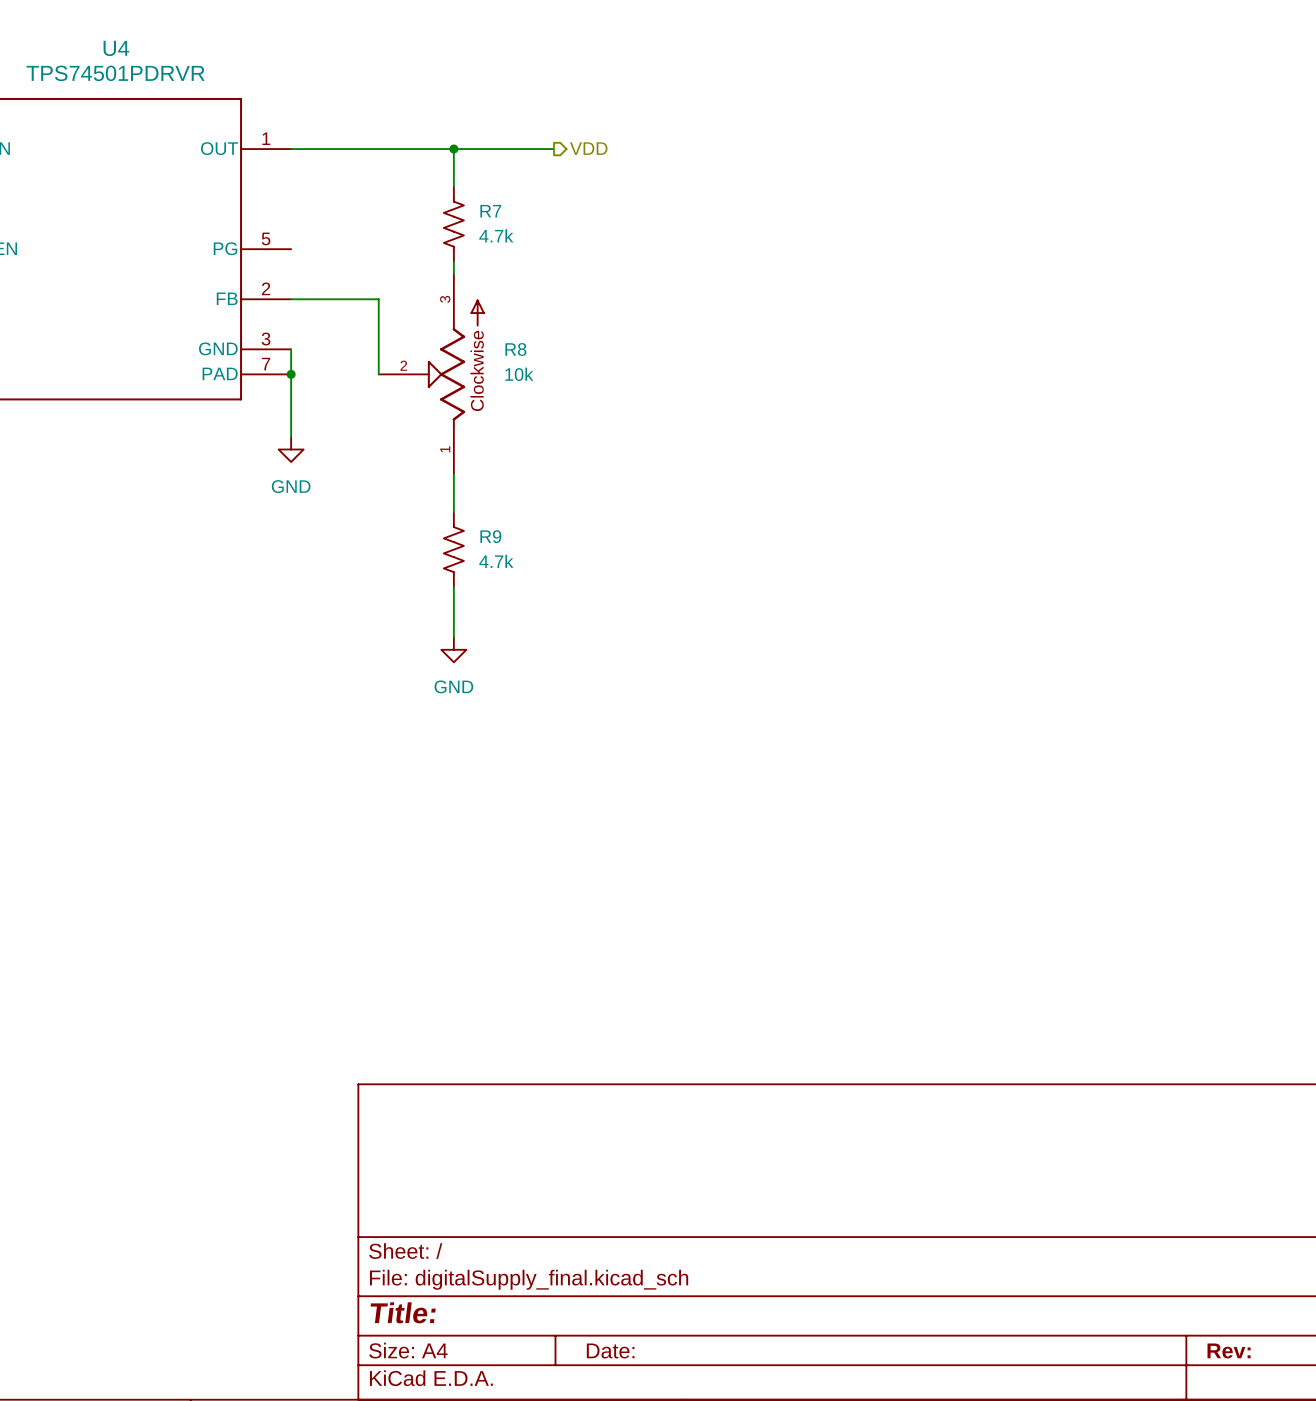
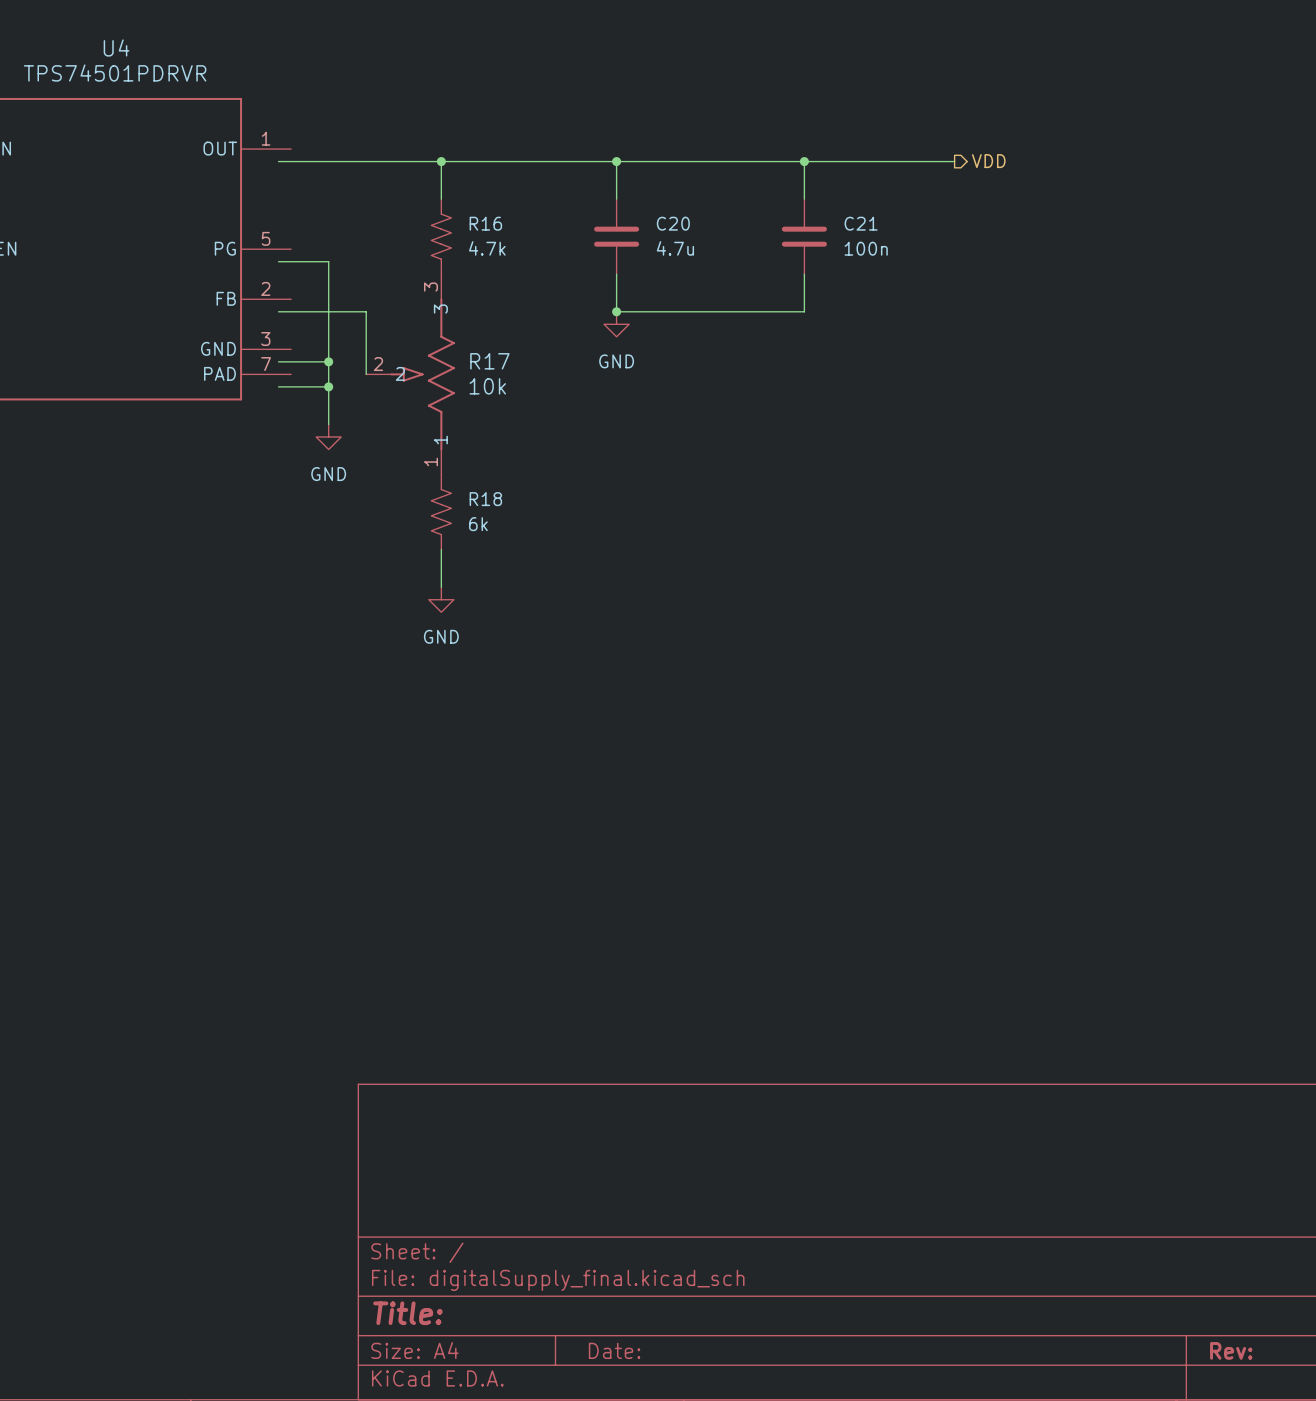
hierarchical label: VDD (588, 148) -> none
wire: (291, 149) (554, 149) -> none
wire: (453, 149) (453, 186) -> (441, 161) (441, 199)
junction position: (453, 149) -> (441, 161)
wire: none -> (278, 161) (954, 161)
wire: none -> (616, 161) (616, 199)
junction: none -> (616, 161)
wire: none -> (804, 161) (804, 199)
junction: none -> (804, 161)
hierarchical label: none -> VDD (988, 161)
R7: 4.7k (453, 224) -> none
R16: none -> 4.7k (441, 236)
C20: none -> 4.7u (616, 236)
C21: none -> 100n (804, 236)
wire: none -> (278, 261) (328, 261) (328, 424)
wire: (453, 261) (453, 274) -> none
wire: none -> (616, 274) (616, 311) (804, 311) (804, 274)
wire: (291, 299) (378, 299) (378, 374) -> none
wire: none -> (278, 311) (366, 311) (366, 374)
junction: none -> (616, 311)
power symbol: none -> GND (616, 324)
wire: (291, 349) (291, 436) -> none
wire: none -> (278, 361) (328, 361)
junction: none -> (328, 361)
junction: (291, 374) -> none
R17: none -> 10k (410, 374)
R8: 10k (431, 374) -> none
wire: none -> (278, 386) (328, 386)
junction: none -> (328, 386)
power symbol position: GND (291, 449) -> GND (328, 436)
wire: (453, 474) (453, 512) -> (441, 549) (441, 587)
R18: none -> 6k (441, 512)
R9: 4.7k (453, 549) -> none
wire: (453, 587) (453, 637) -> none
power symbol position: GND (453, 649) -> GND (441, 599)

